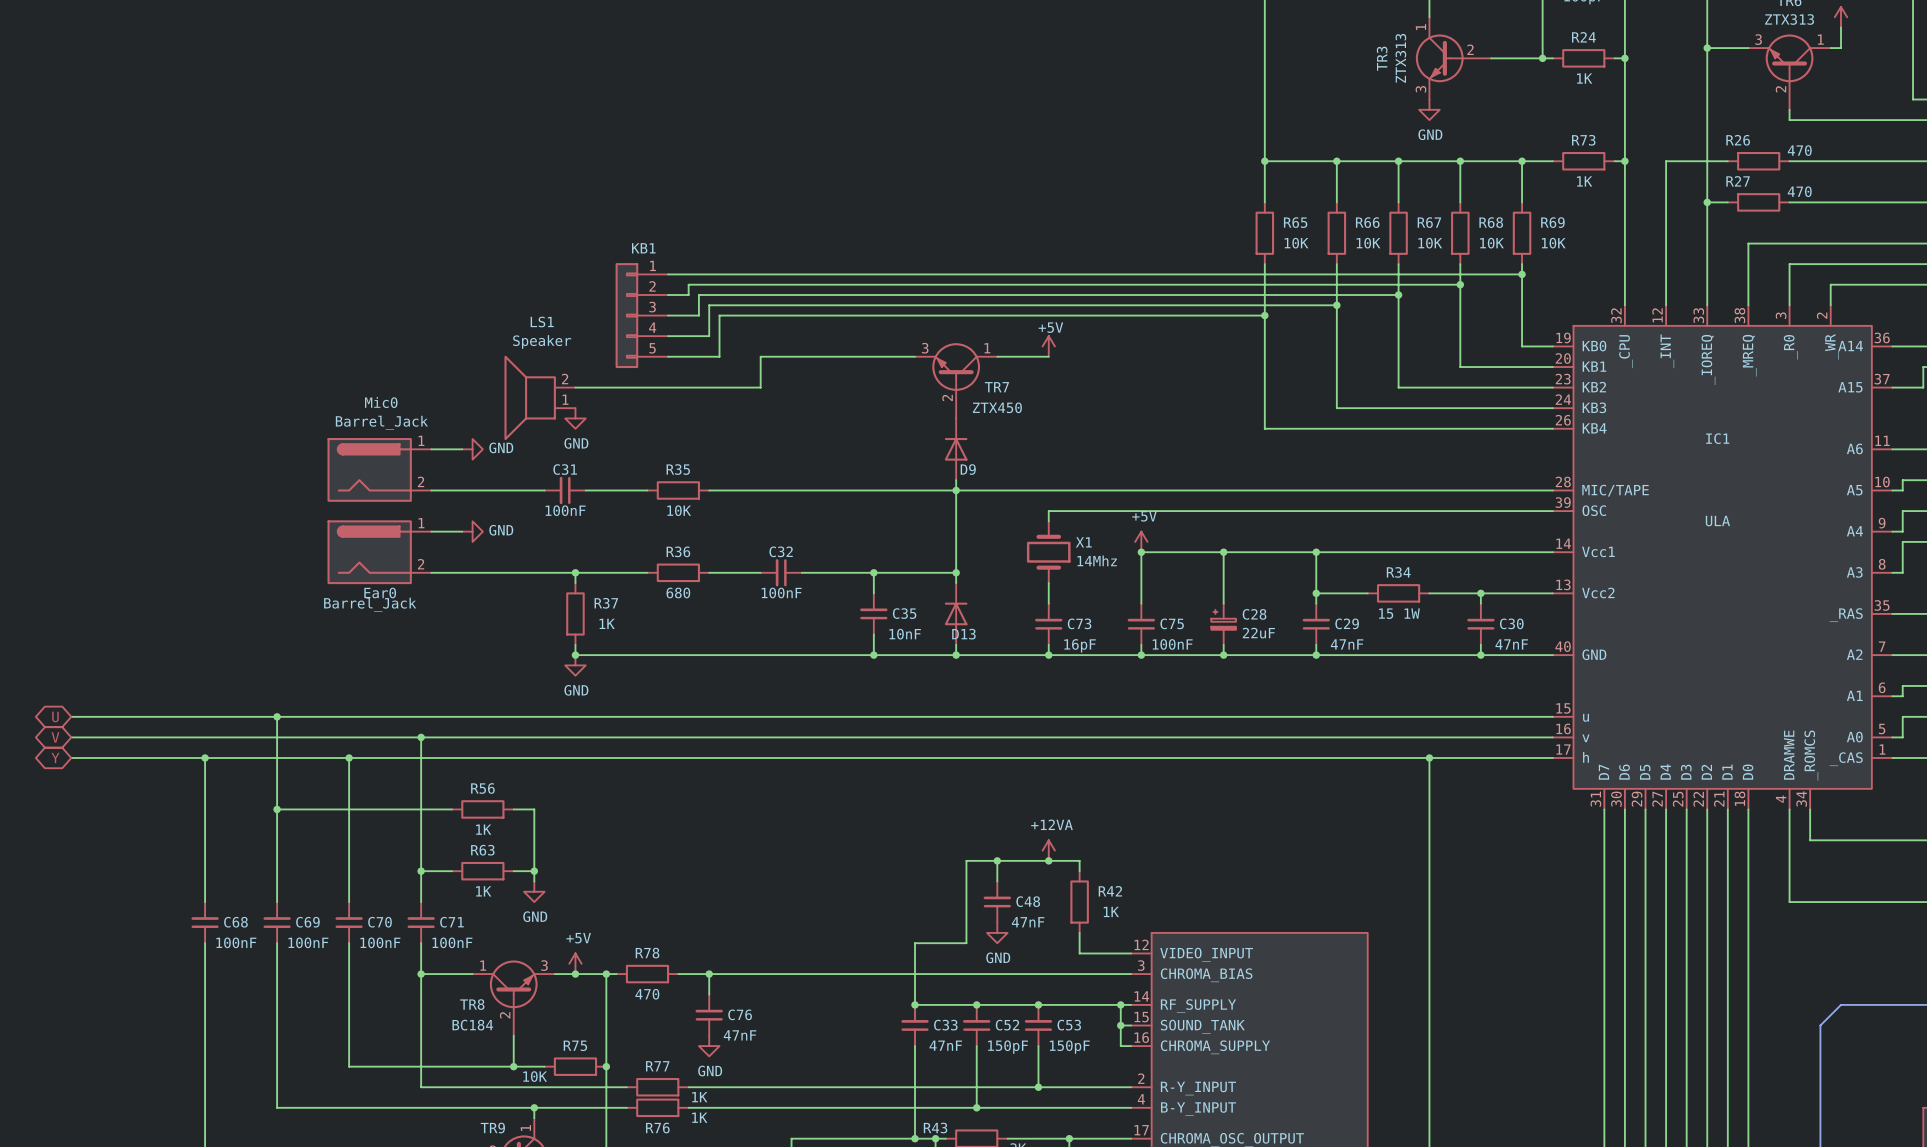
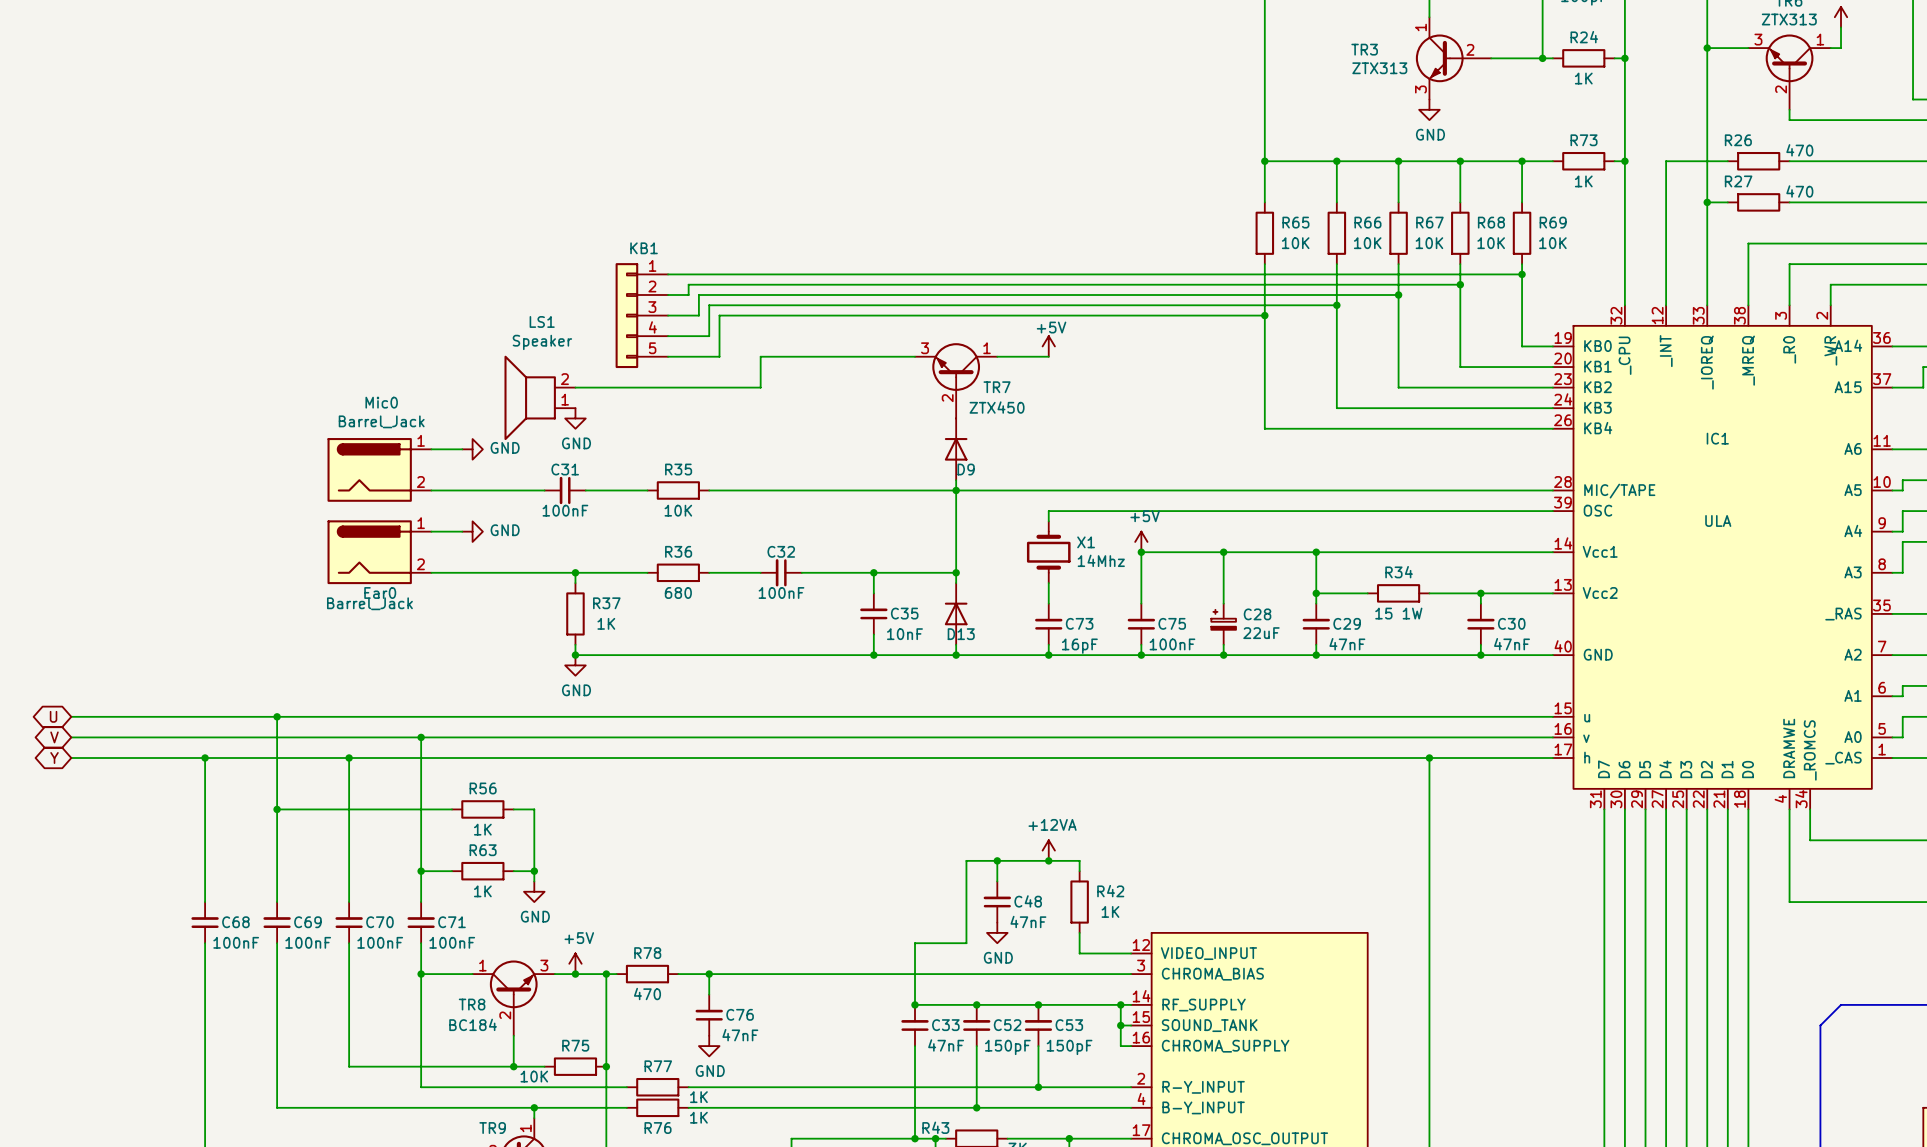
TR3 name rotation: 0° (1382, 58) -> 90° clockwise (1364, 49)
TR3 value rotation: 0° (1400, 58) -> 90° clockwise (1379, 68)

